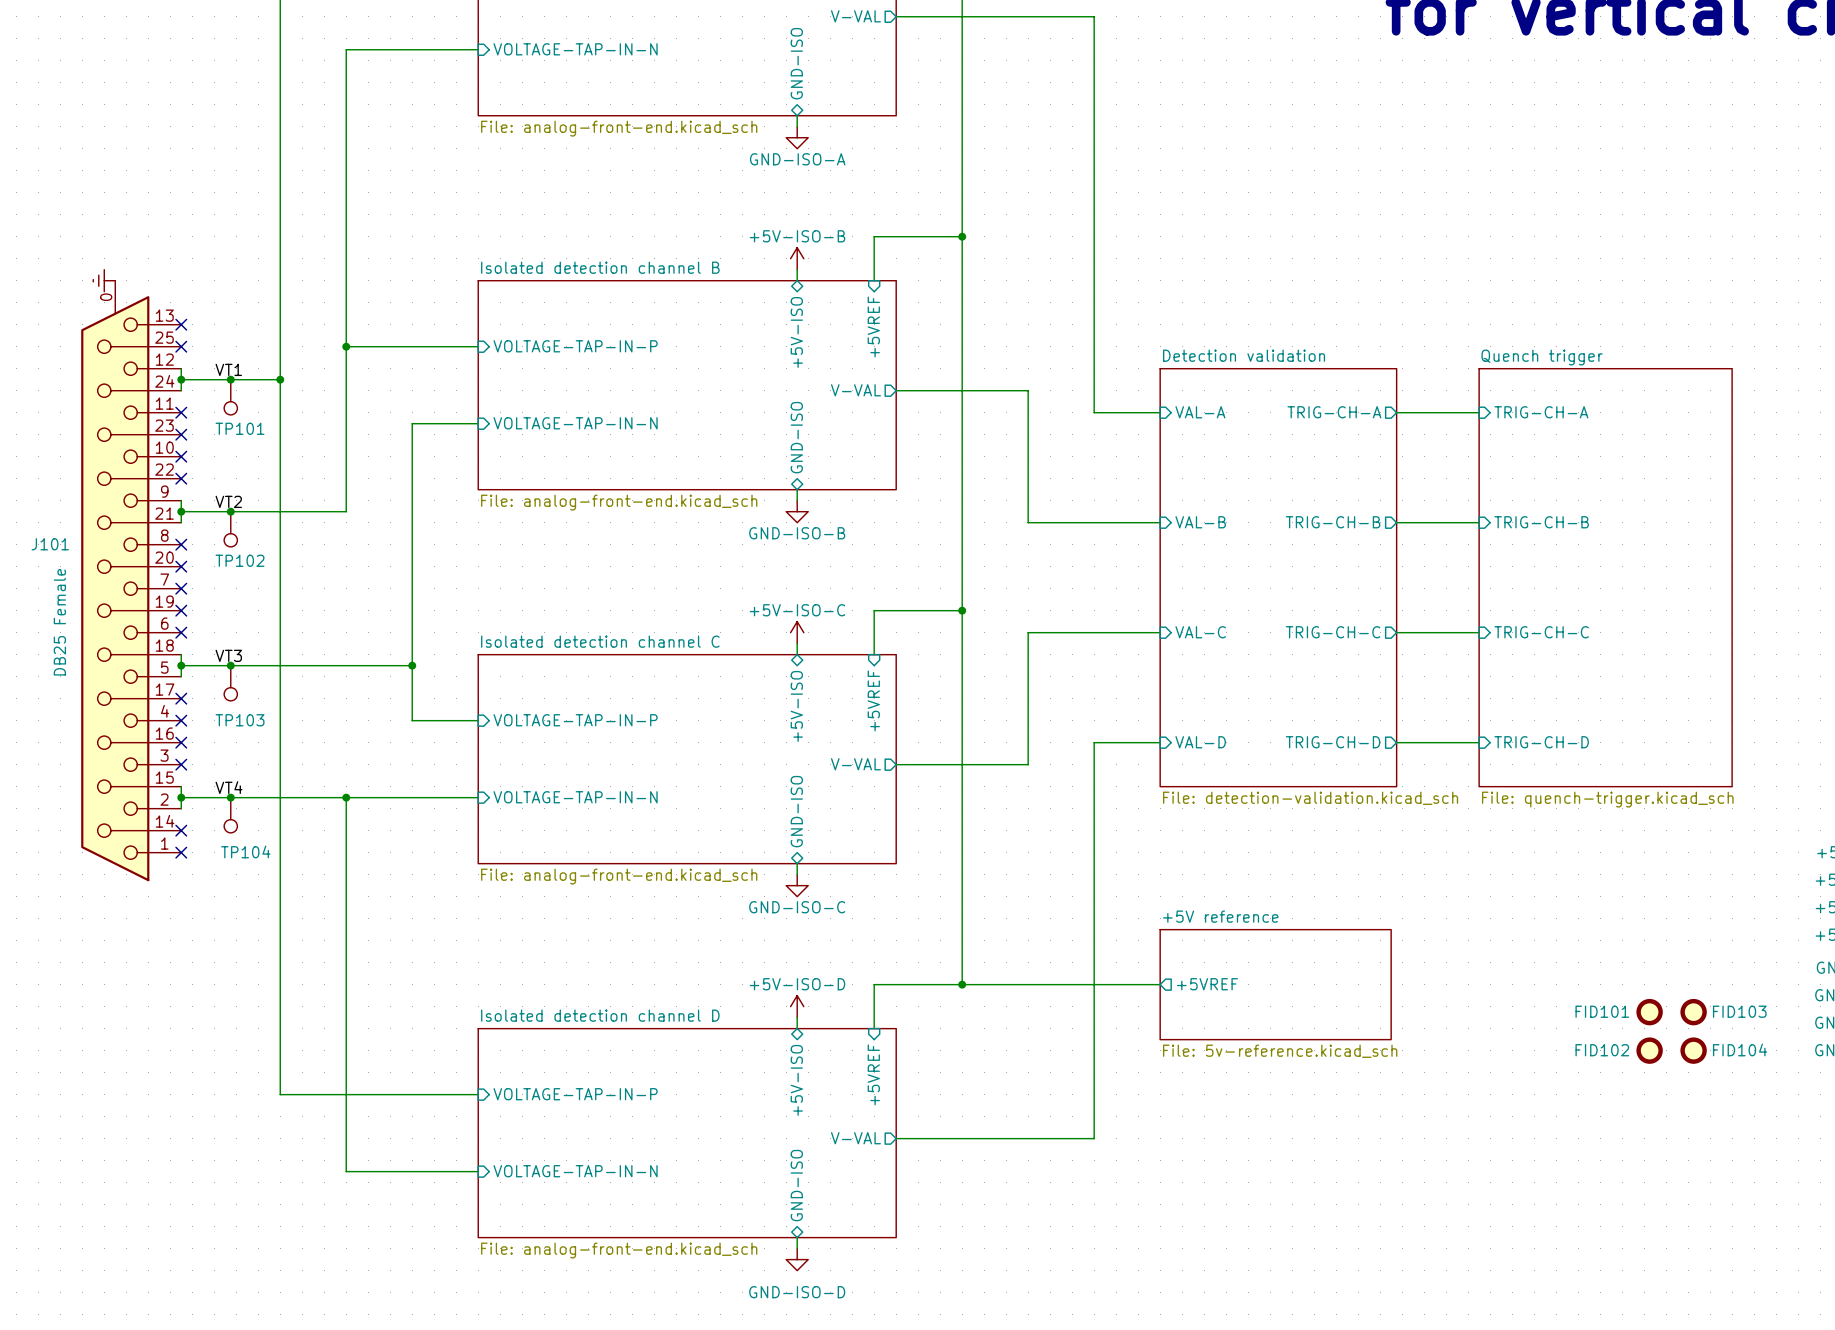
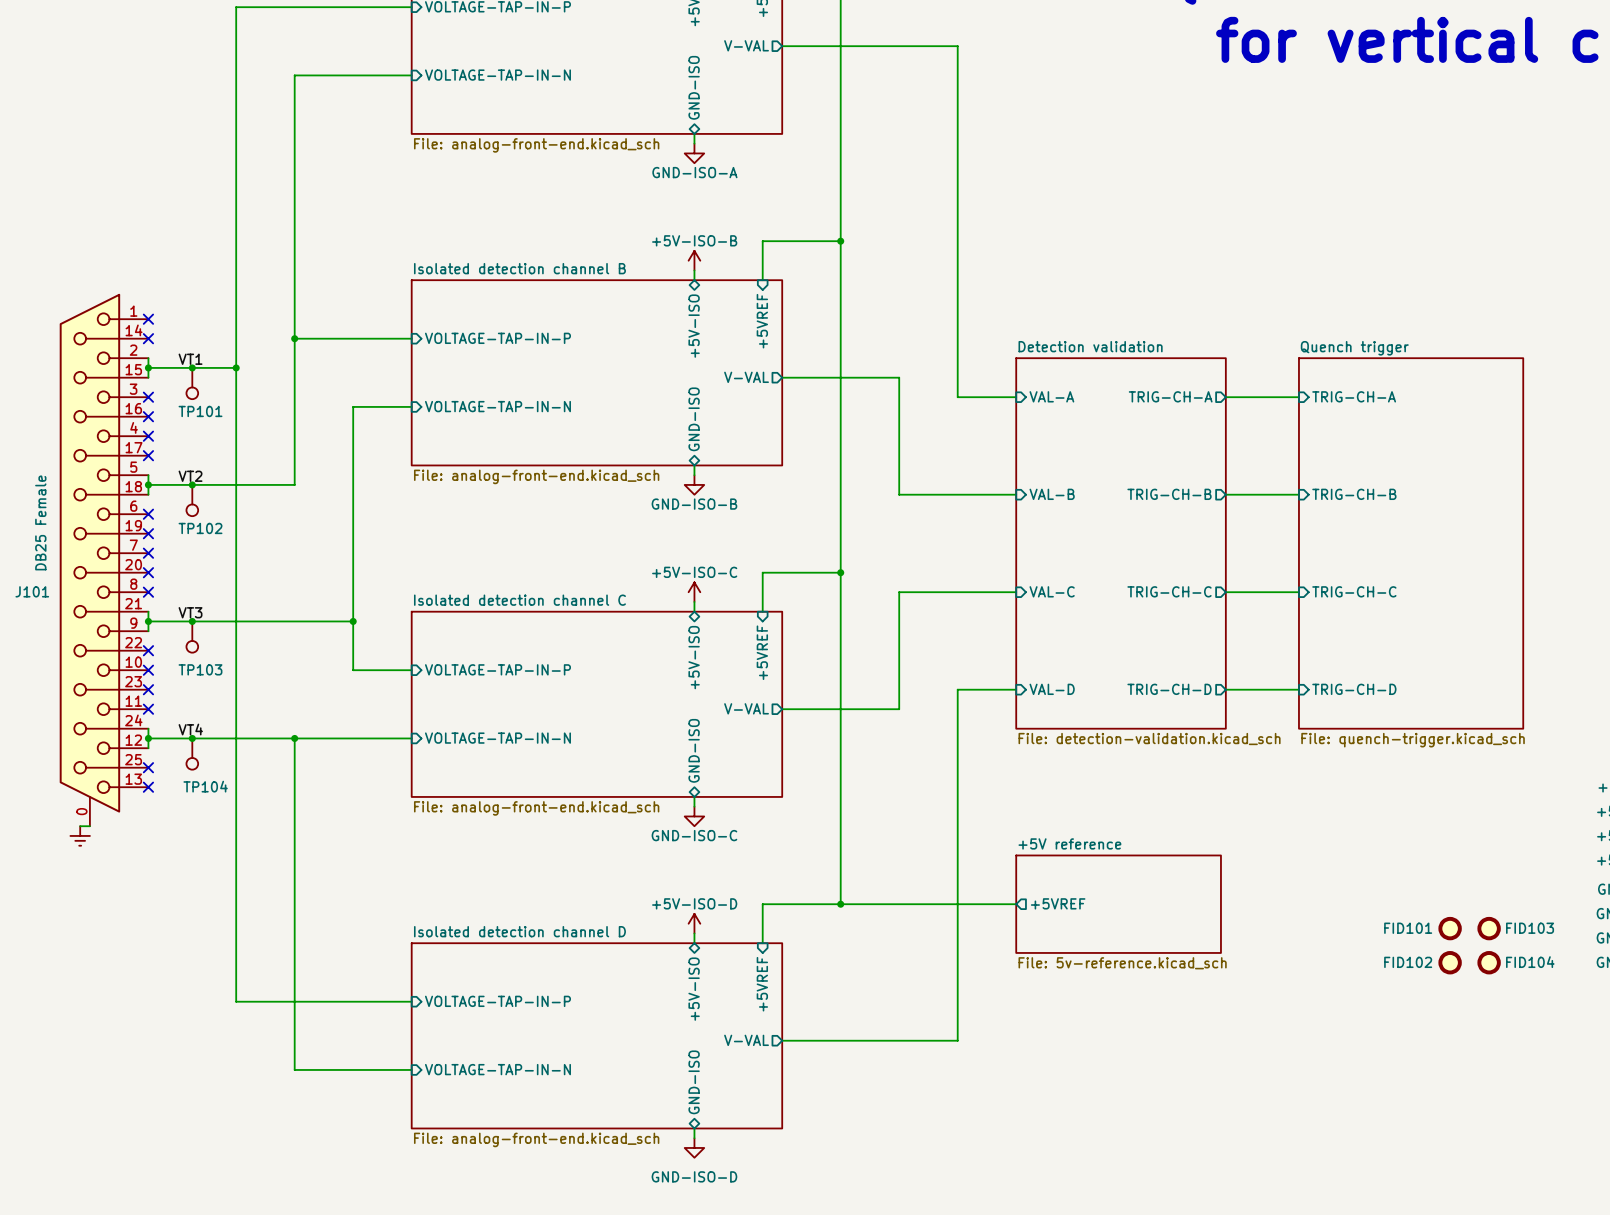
power symbol: (104, 280) -> none
J101 flip: as is (115, 588) -> up-down (89, 553)
wire: none -> (80, 826) (89, 826)
power symbol: none -> (80, 835)

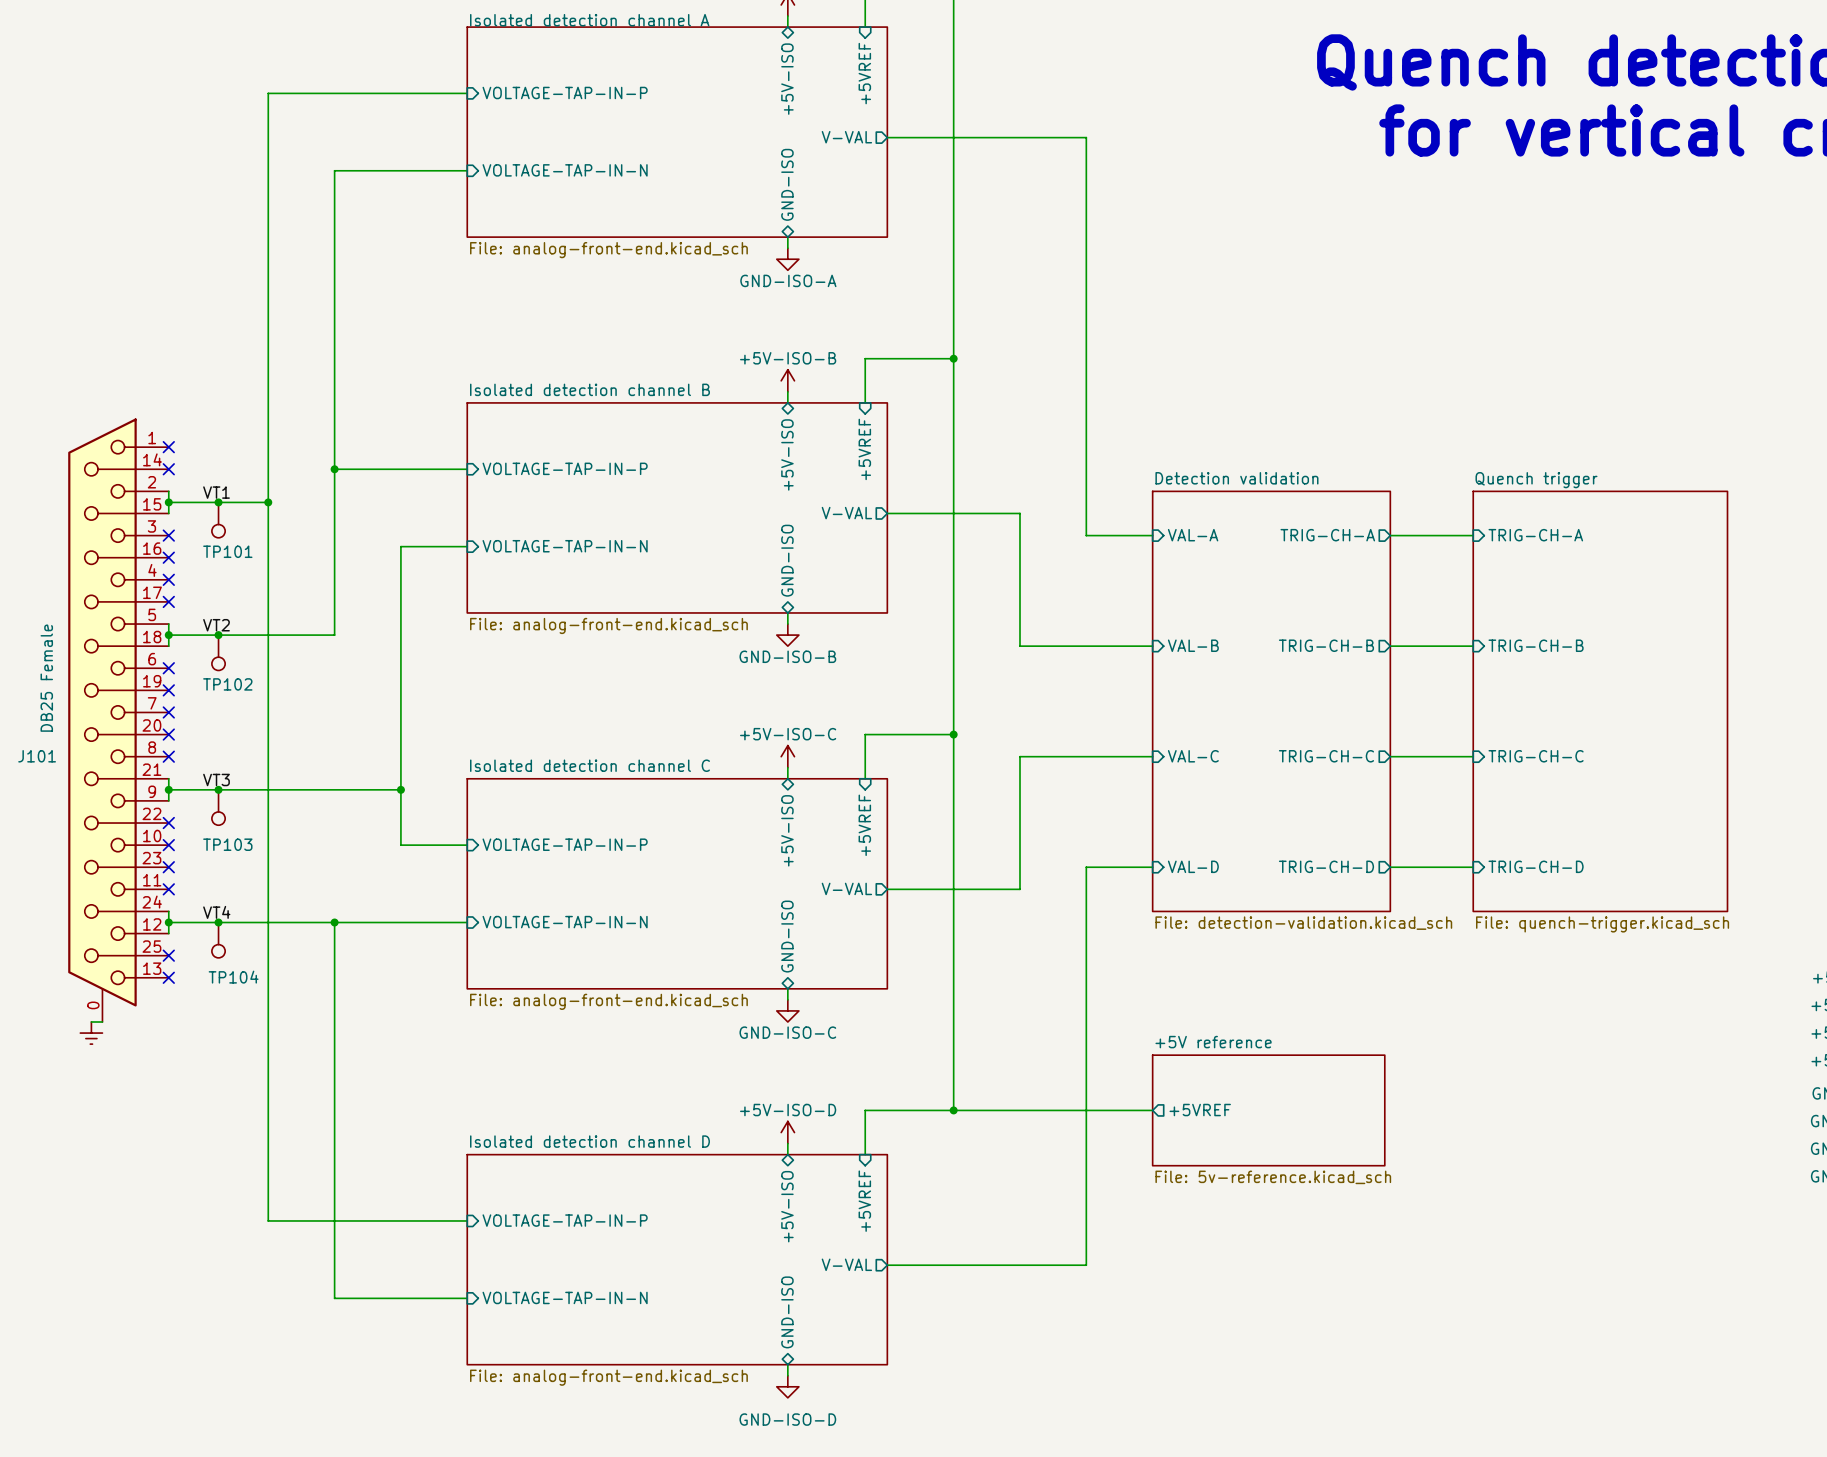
FID101: (1450, 928) -> none
FID103: (1489, 928) -> none
FID102: (1450, 962) -> none
FID104: (1489, 962) -> none

